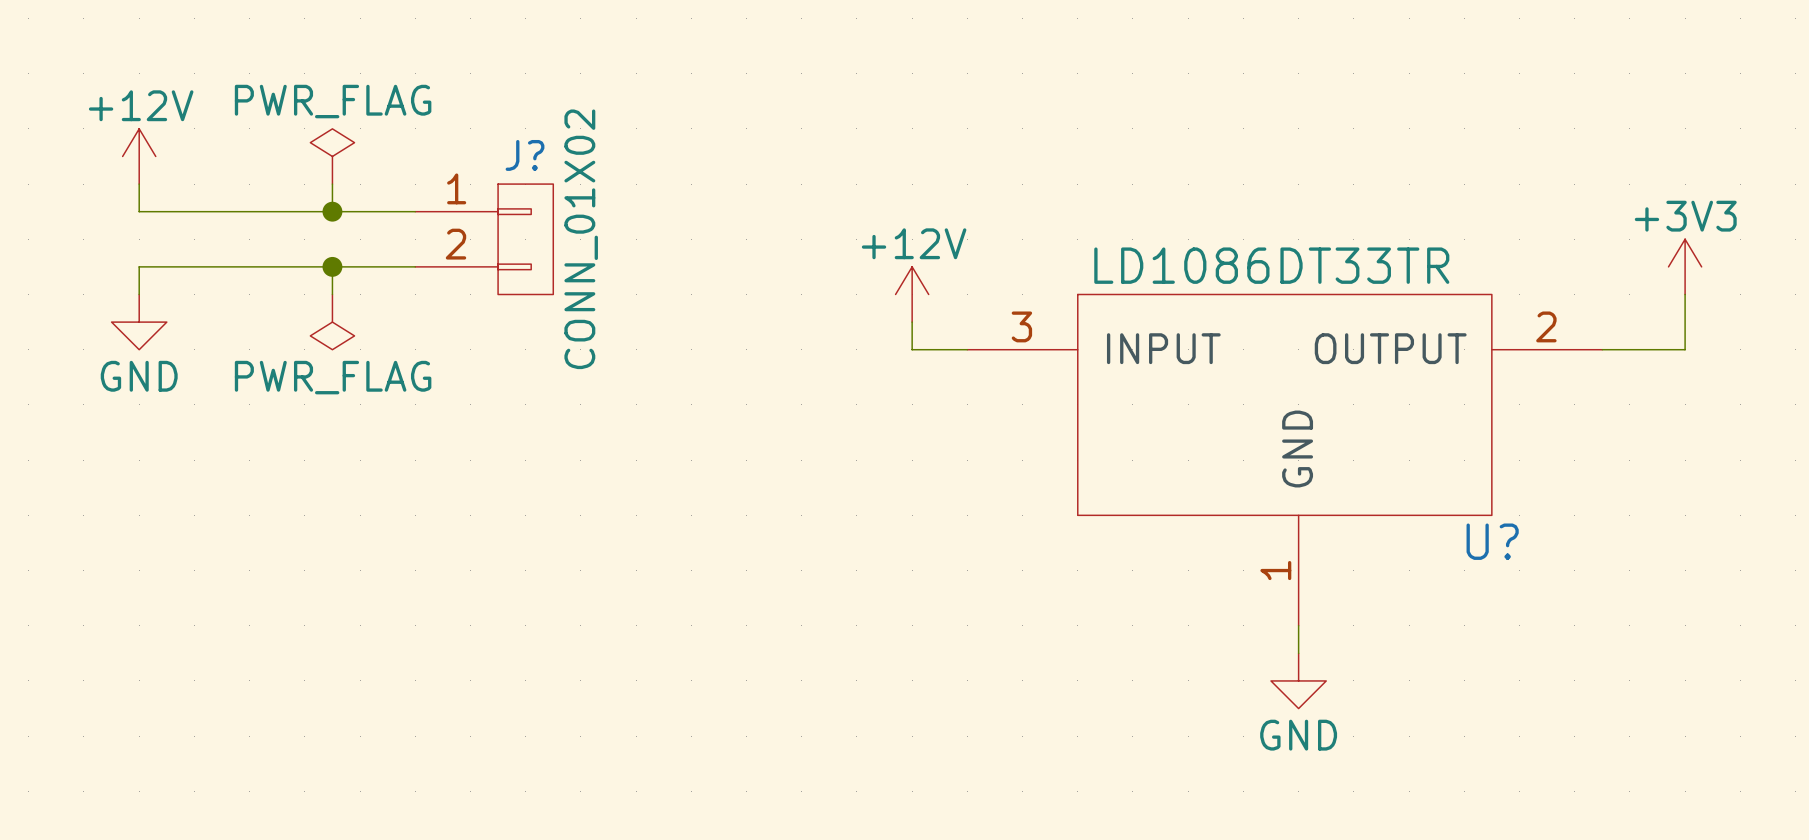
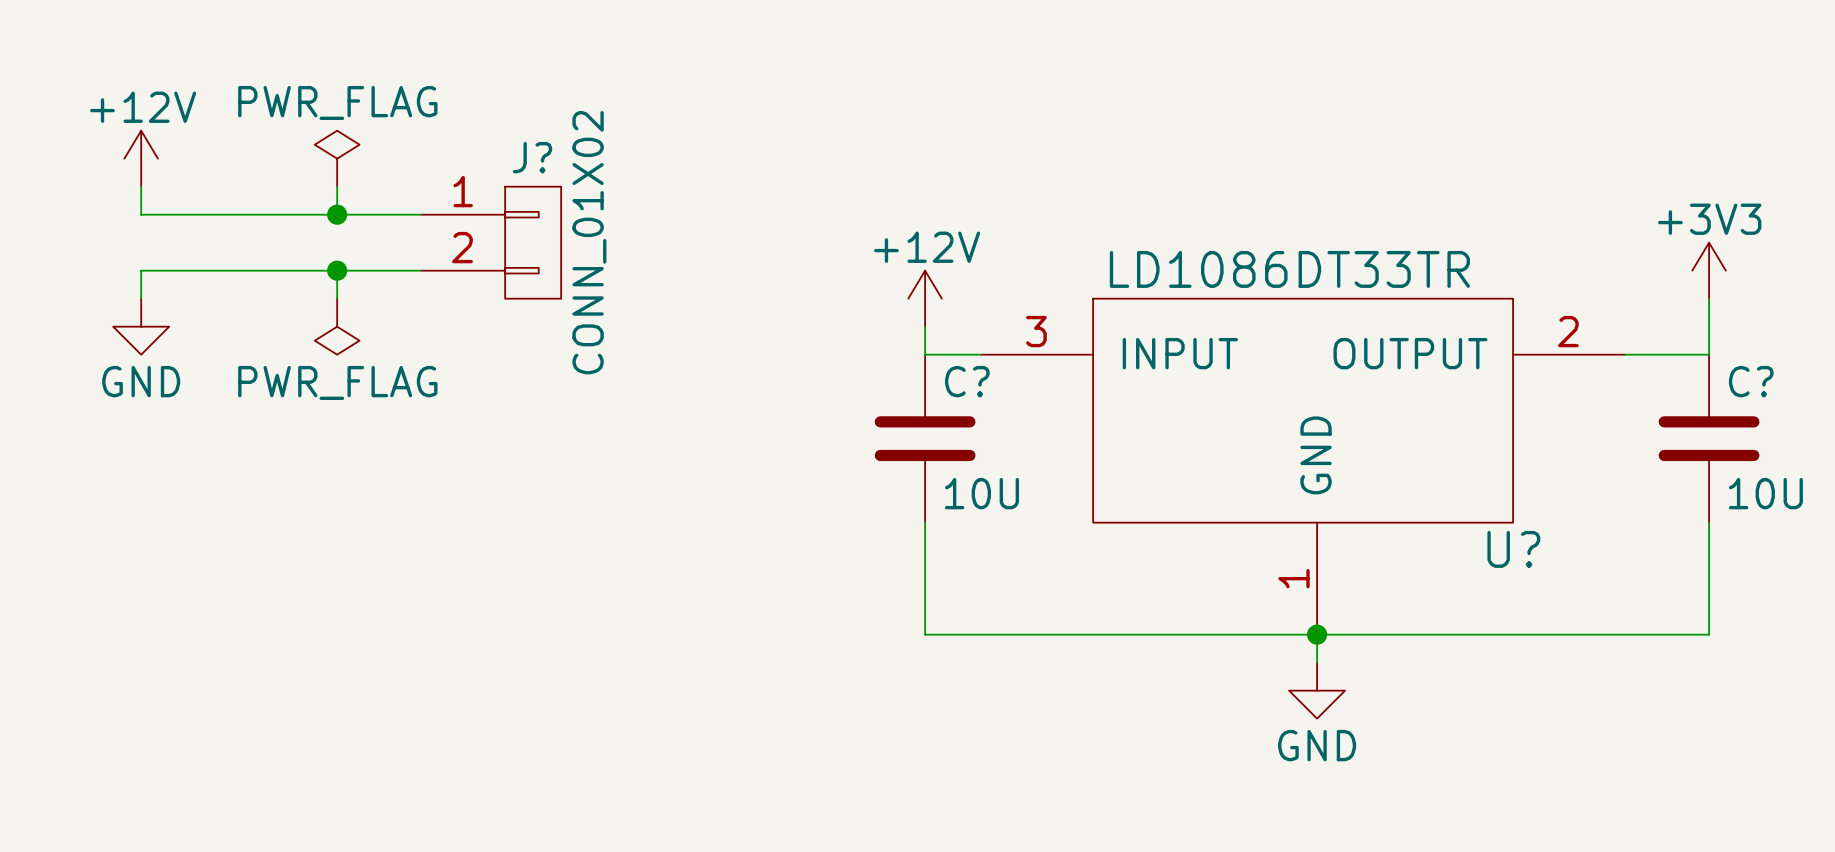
C?: none -> 10U (925, 438)
C?: none -> 10U (1709, 438)
wire: none -> (925, 522) (925, 634) (1709, 634) (1709, 522)
junction: none -> (1317, 634)

